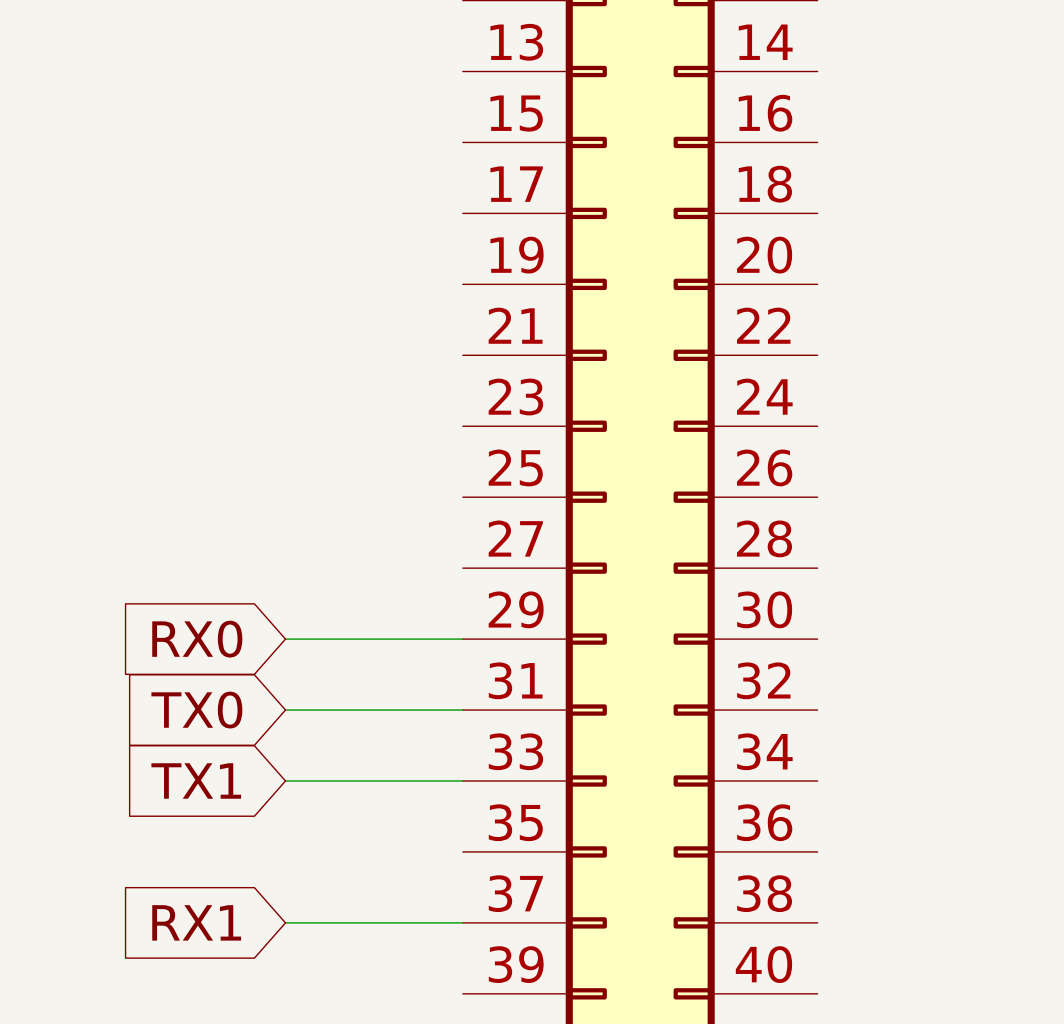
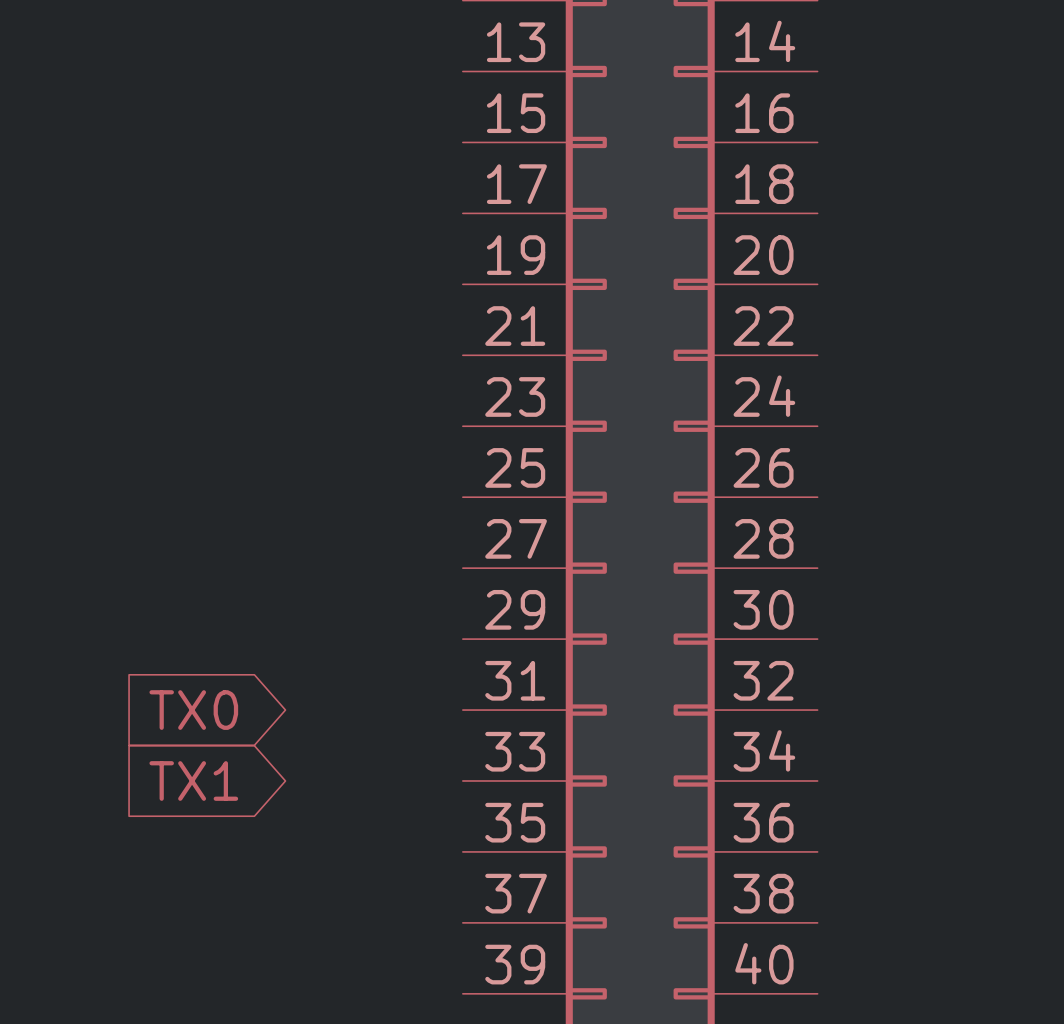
global label: RX0 (197, 639) -> none
wire: (285, 639) (462, 639) -> none
wire: (285, 710) (462, 710) -> none
wire: (285, 780) (462, 780) -> none
global label: RX1 (196, 922) -> none
wire: (285, 922) (462, 922) -> none

